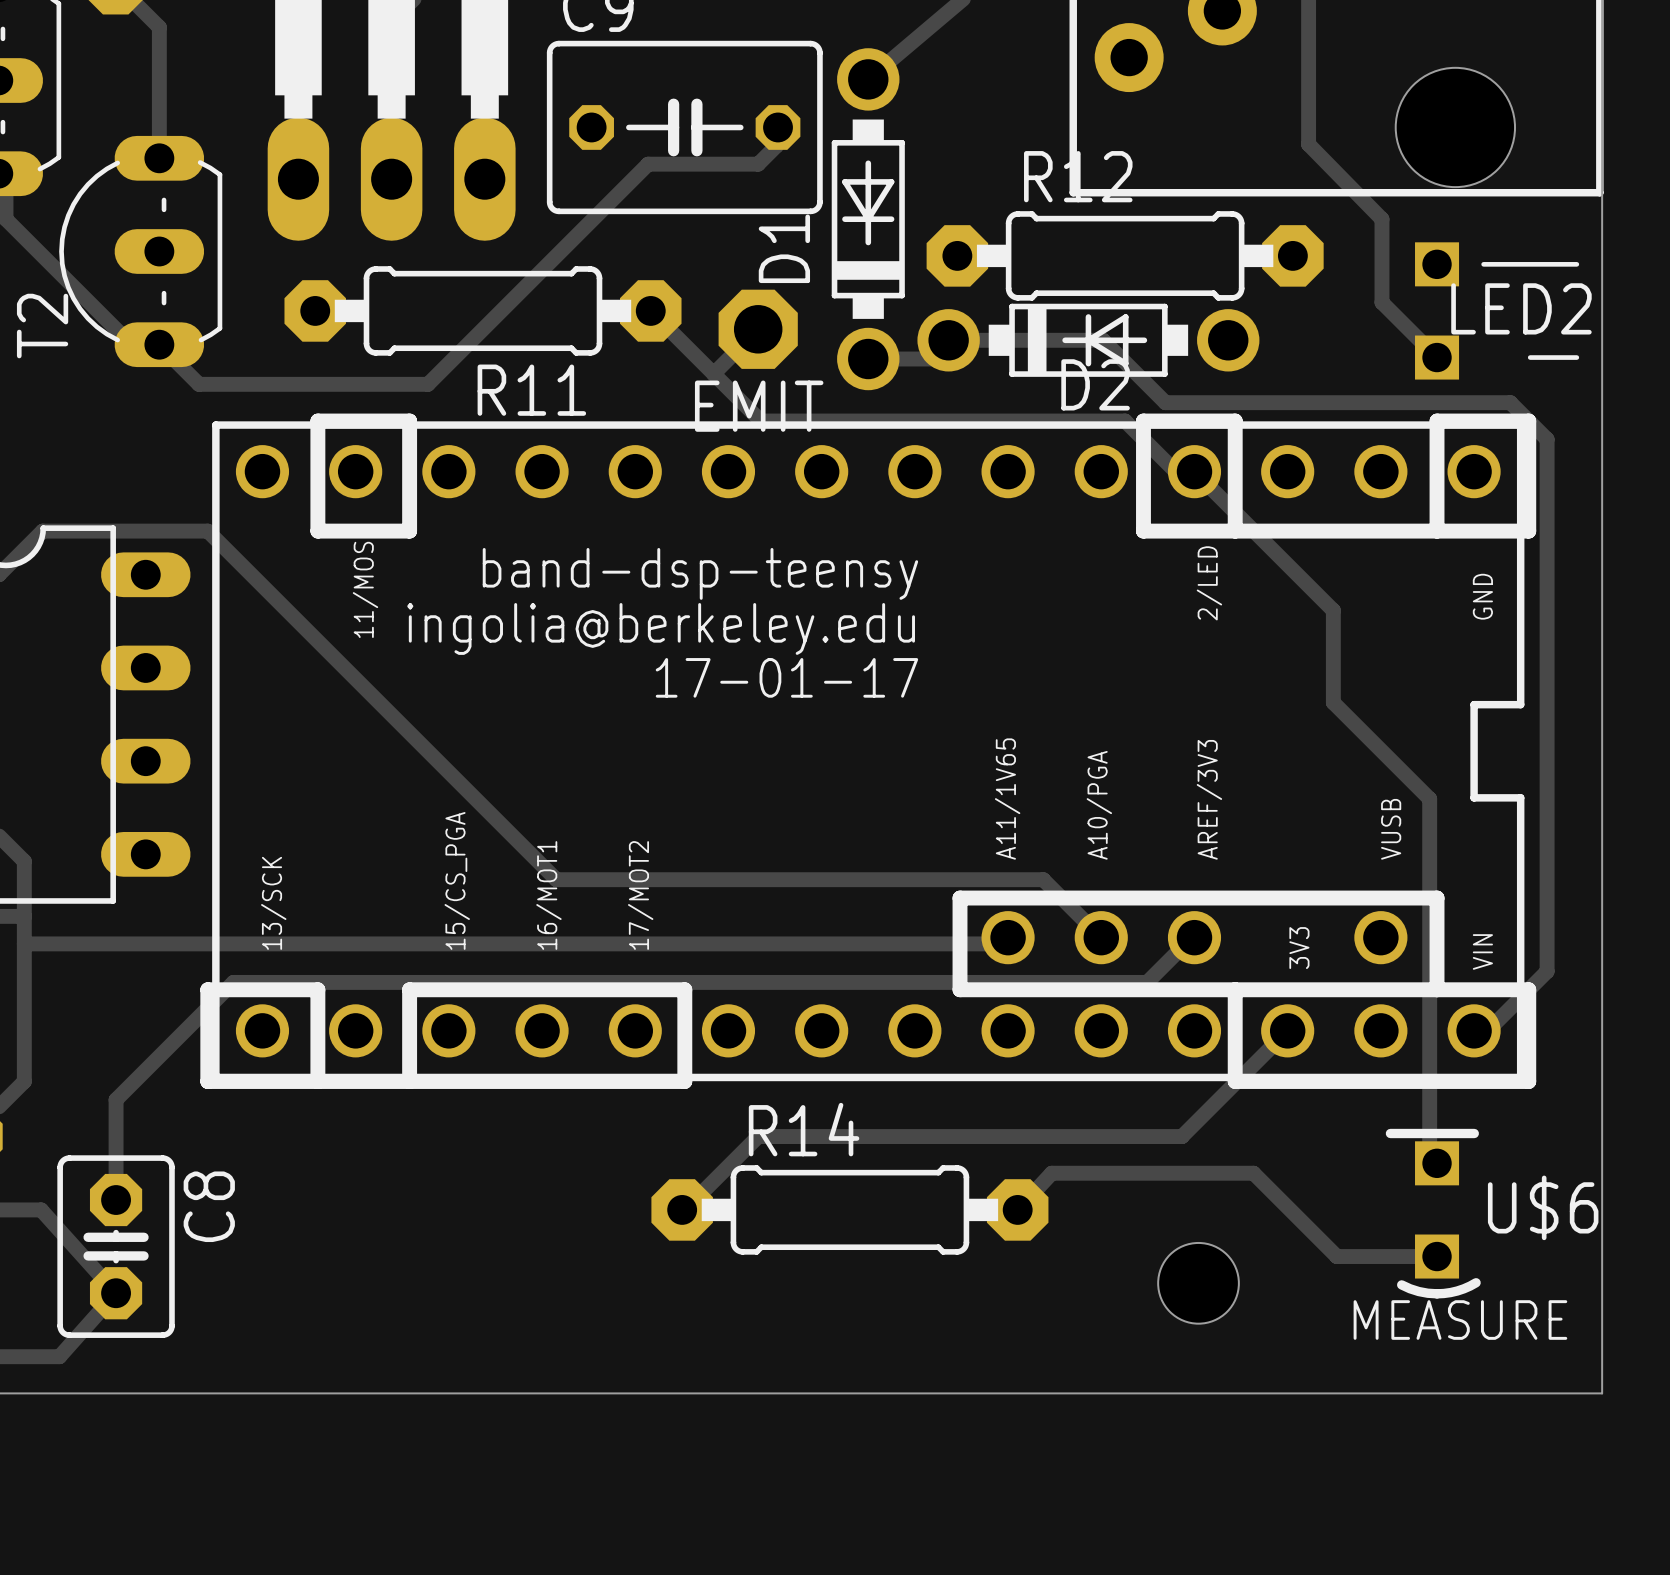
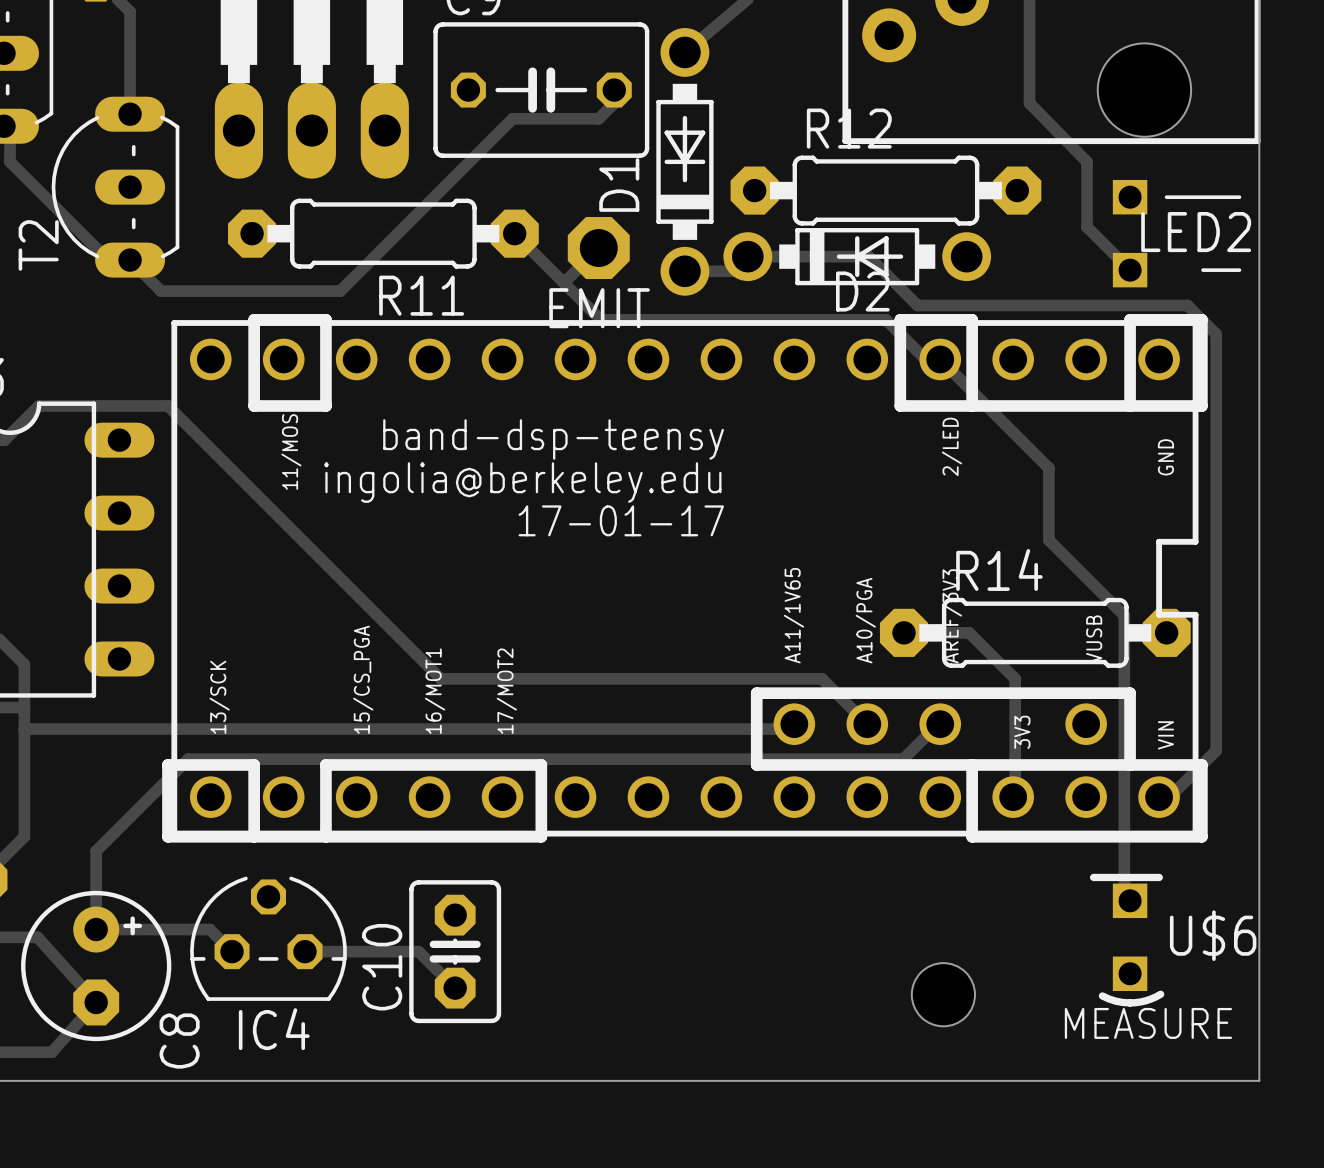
track: (1287, 1030) (1182, 1136) (758, 1136) (684, 1209) (682, 1209) -> (1013, 797) (1015, 795) (1015, 678) (969, 632) (904, 632)
C8 footprint: [57, 1155, 175, 1338] -> [21, 890, 172, 1042]
track: none -> (96, 929) (209, 929) (232, 951)
C8 name position: C8 (209, 1206) -> C8 (179, 1041)
R14 position: (849, 1209) -> (1035, 632)
track: (1017, 1209) (1051, 1173) (1253, 1173) (1336, 1256) (1437, 1256) -> none
IC4: none -> (268, 938)
track: none -> (304, 951) (418, 951) (455, 988)
C10: none -> (455, 951)

